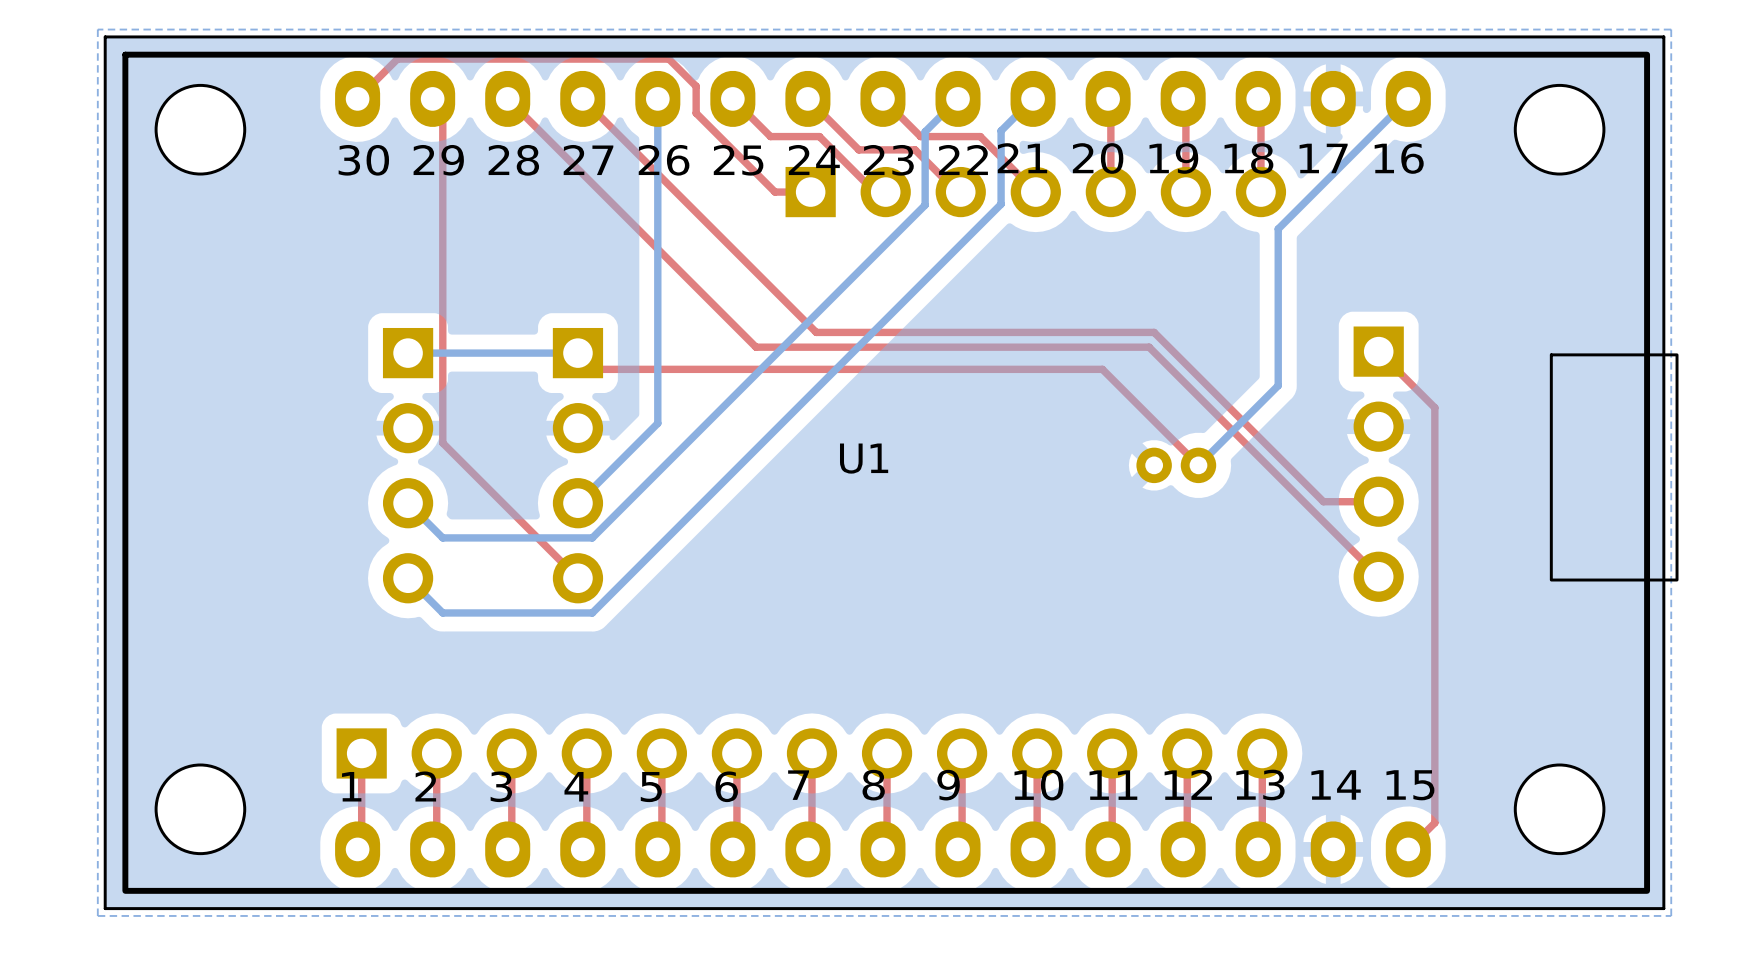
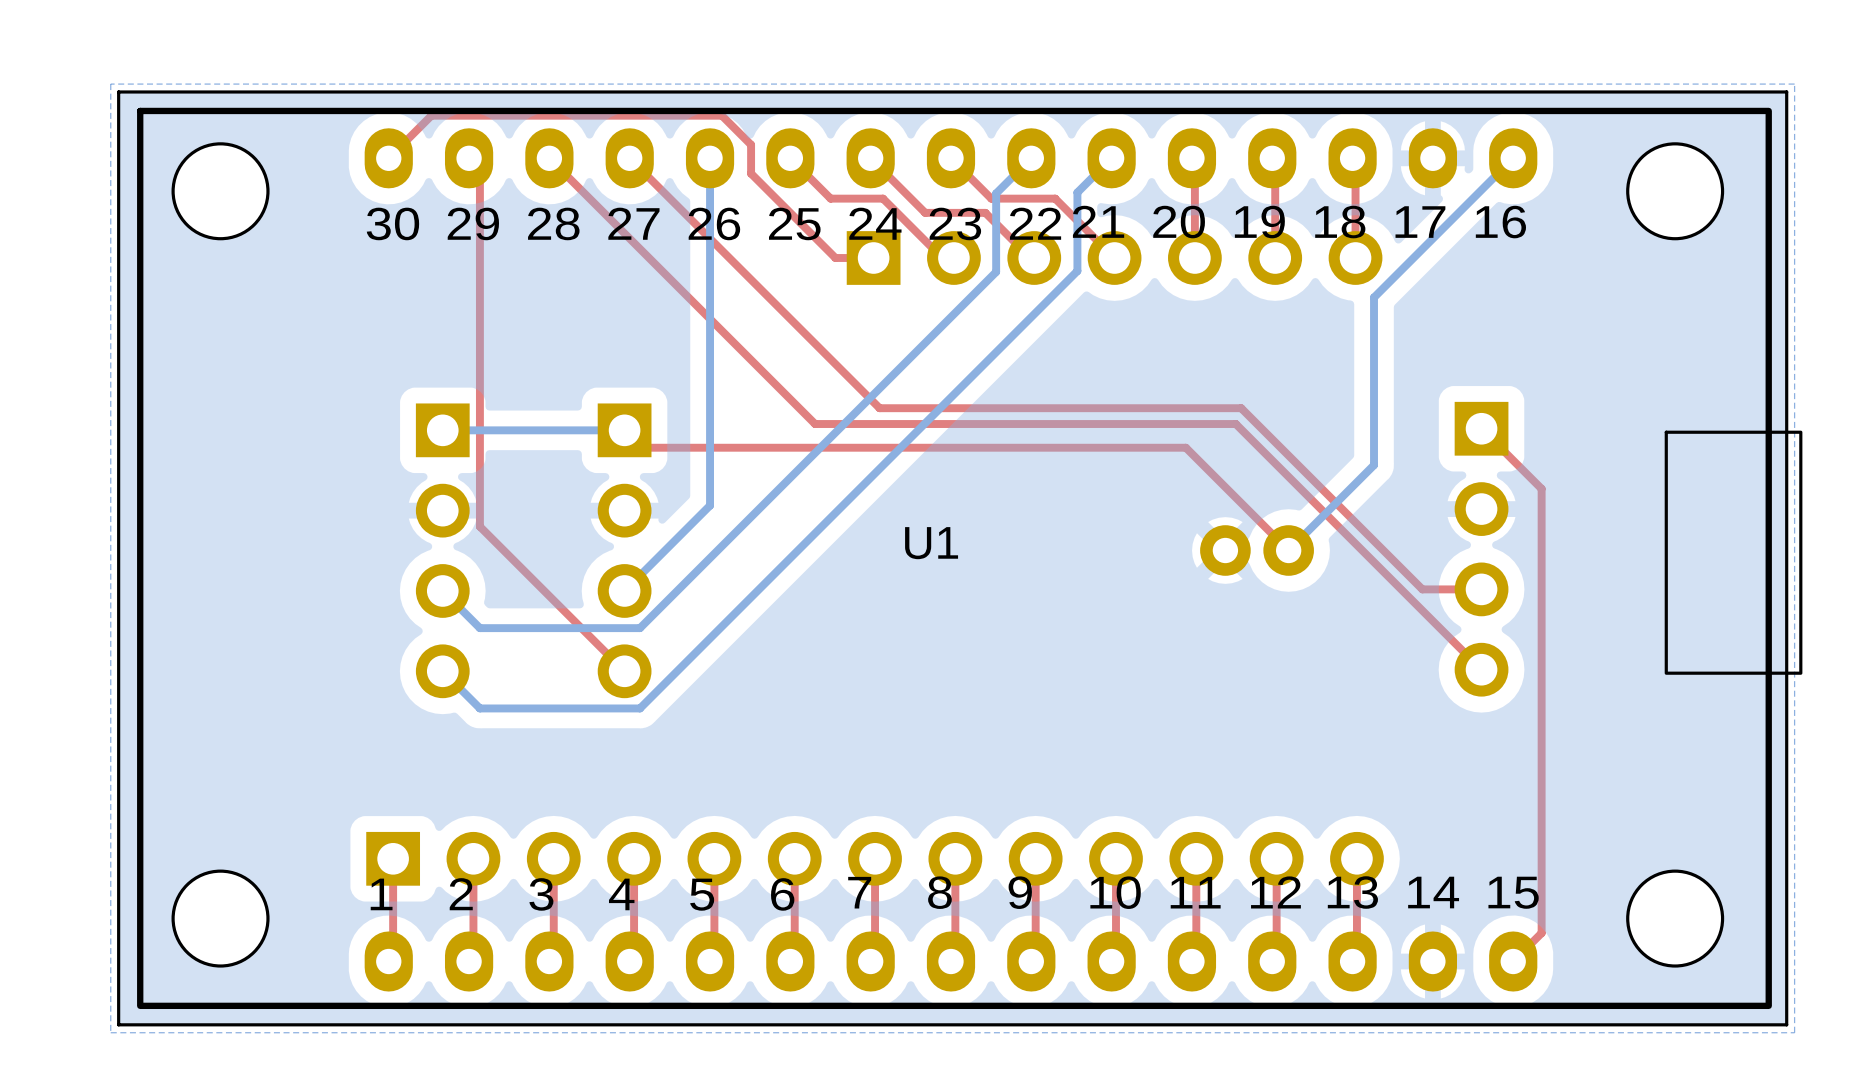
part footprint: [1136, 447, 1217, 484] -> [1200, 525, 1314, 576]

